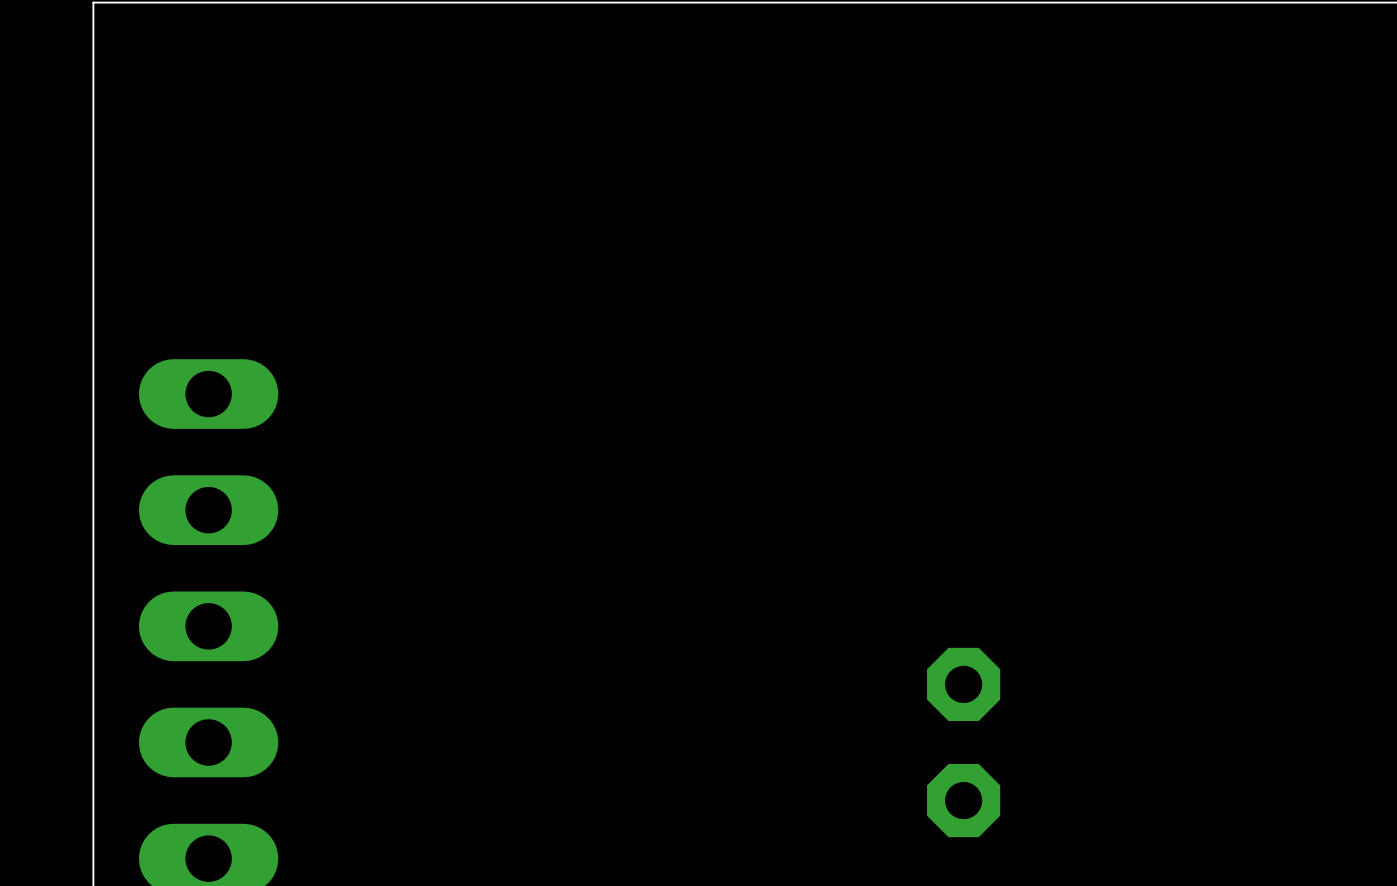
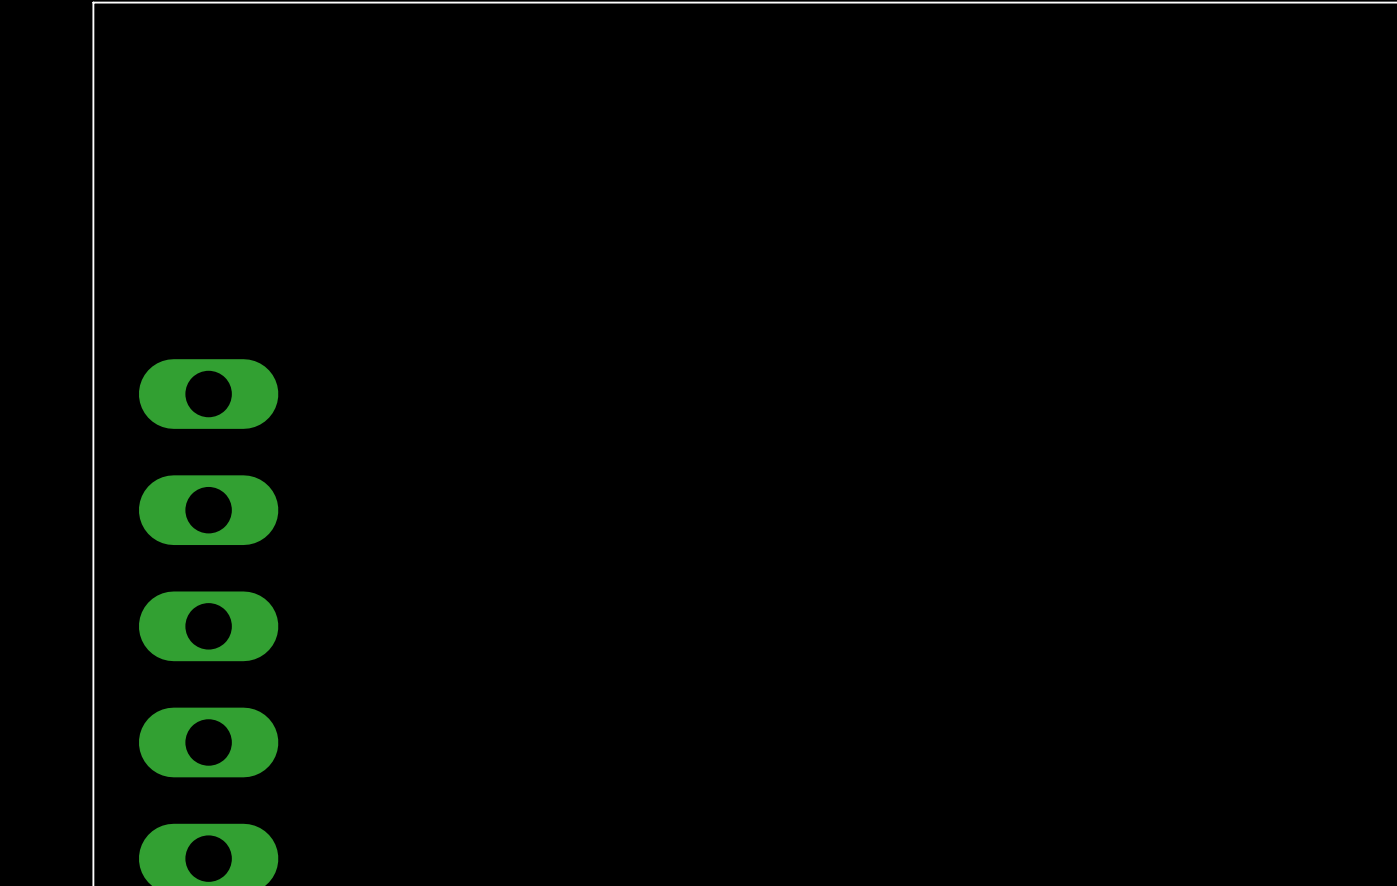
part: (963, 742) -> none

